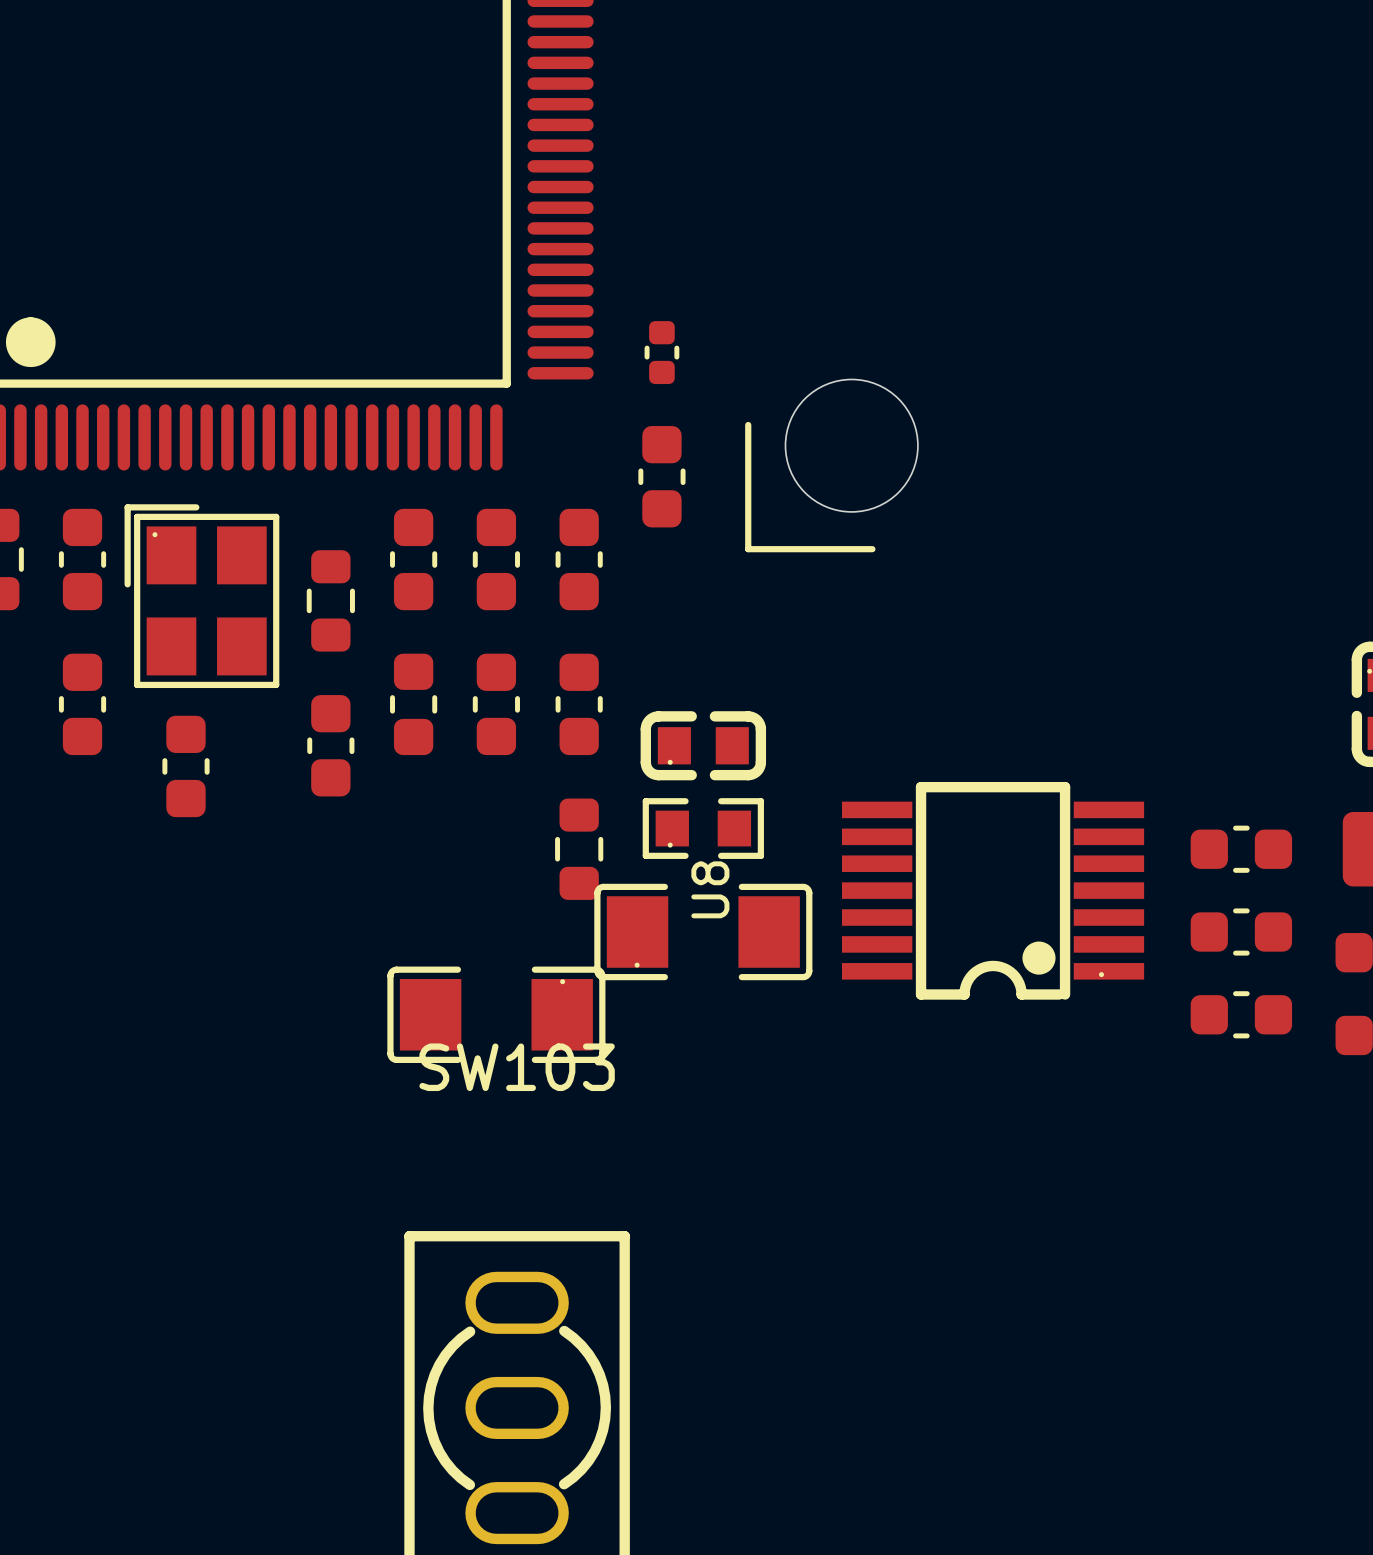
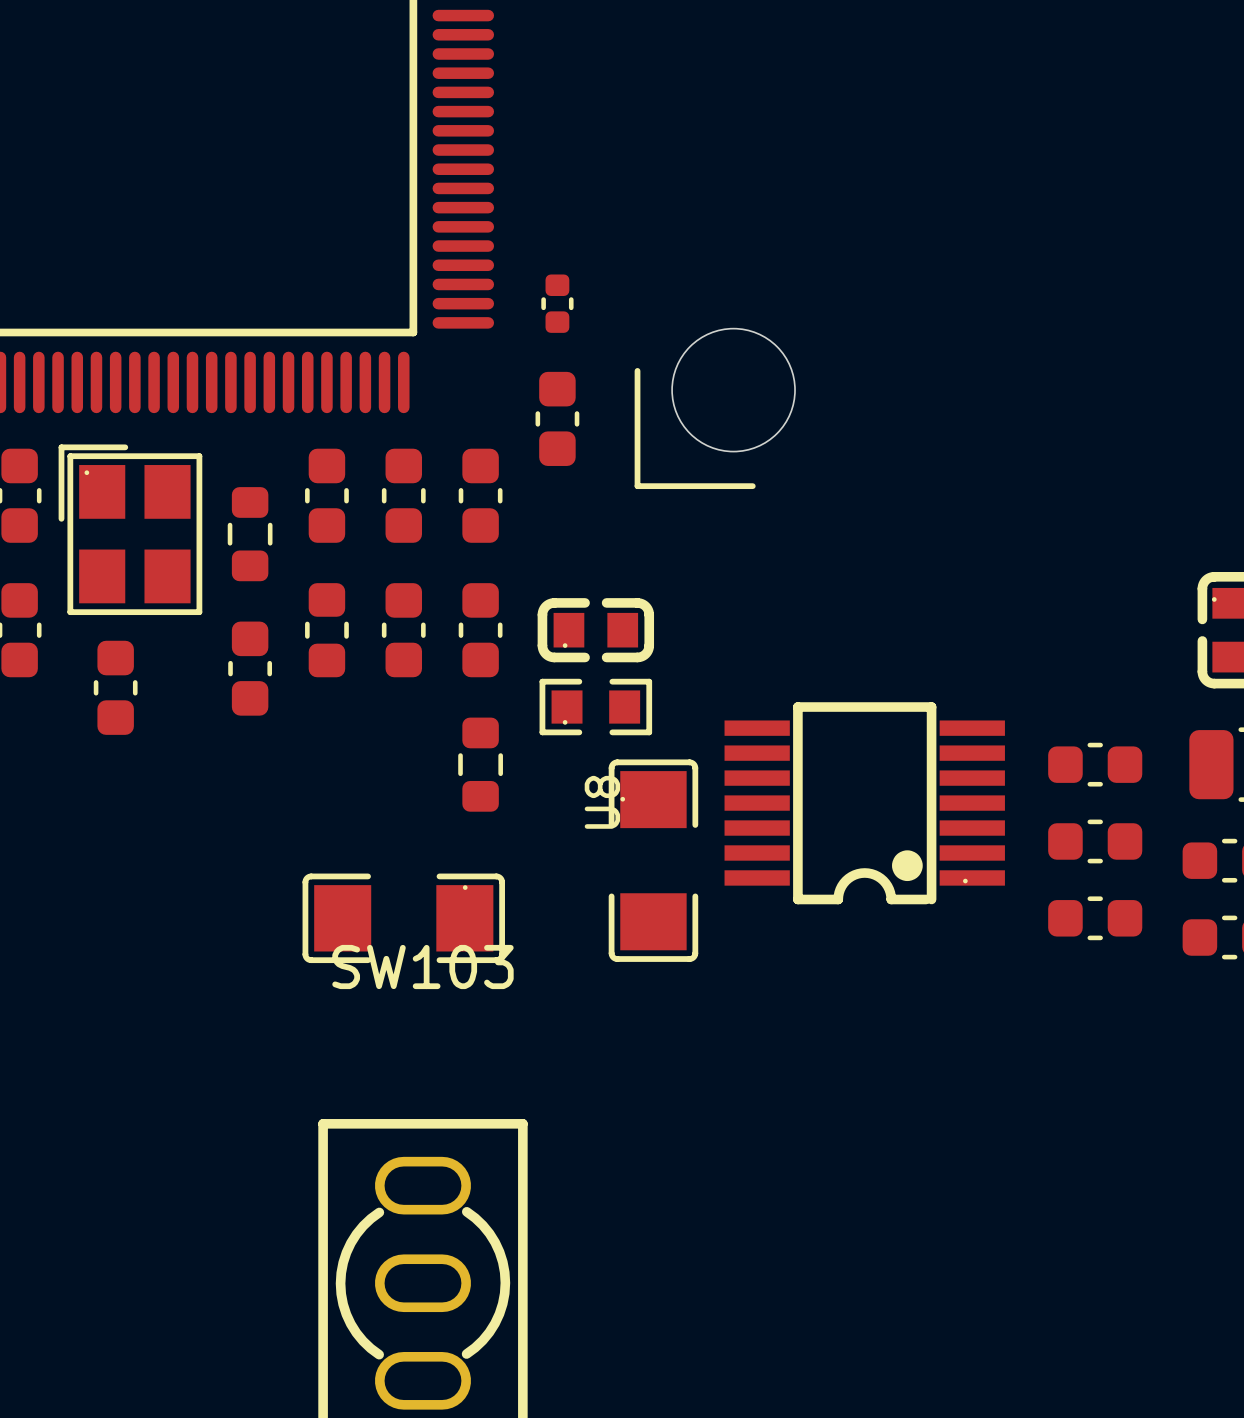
part position: (703, 745) -> (595, 630)
part position: (703, 828) -> (595, 707)
part rotation: 0° (703, 932) -> 90° clockwise (653, 860)

